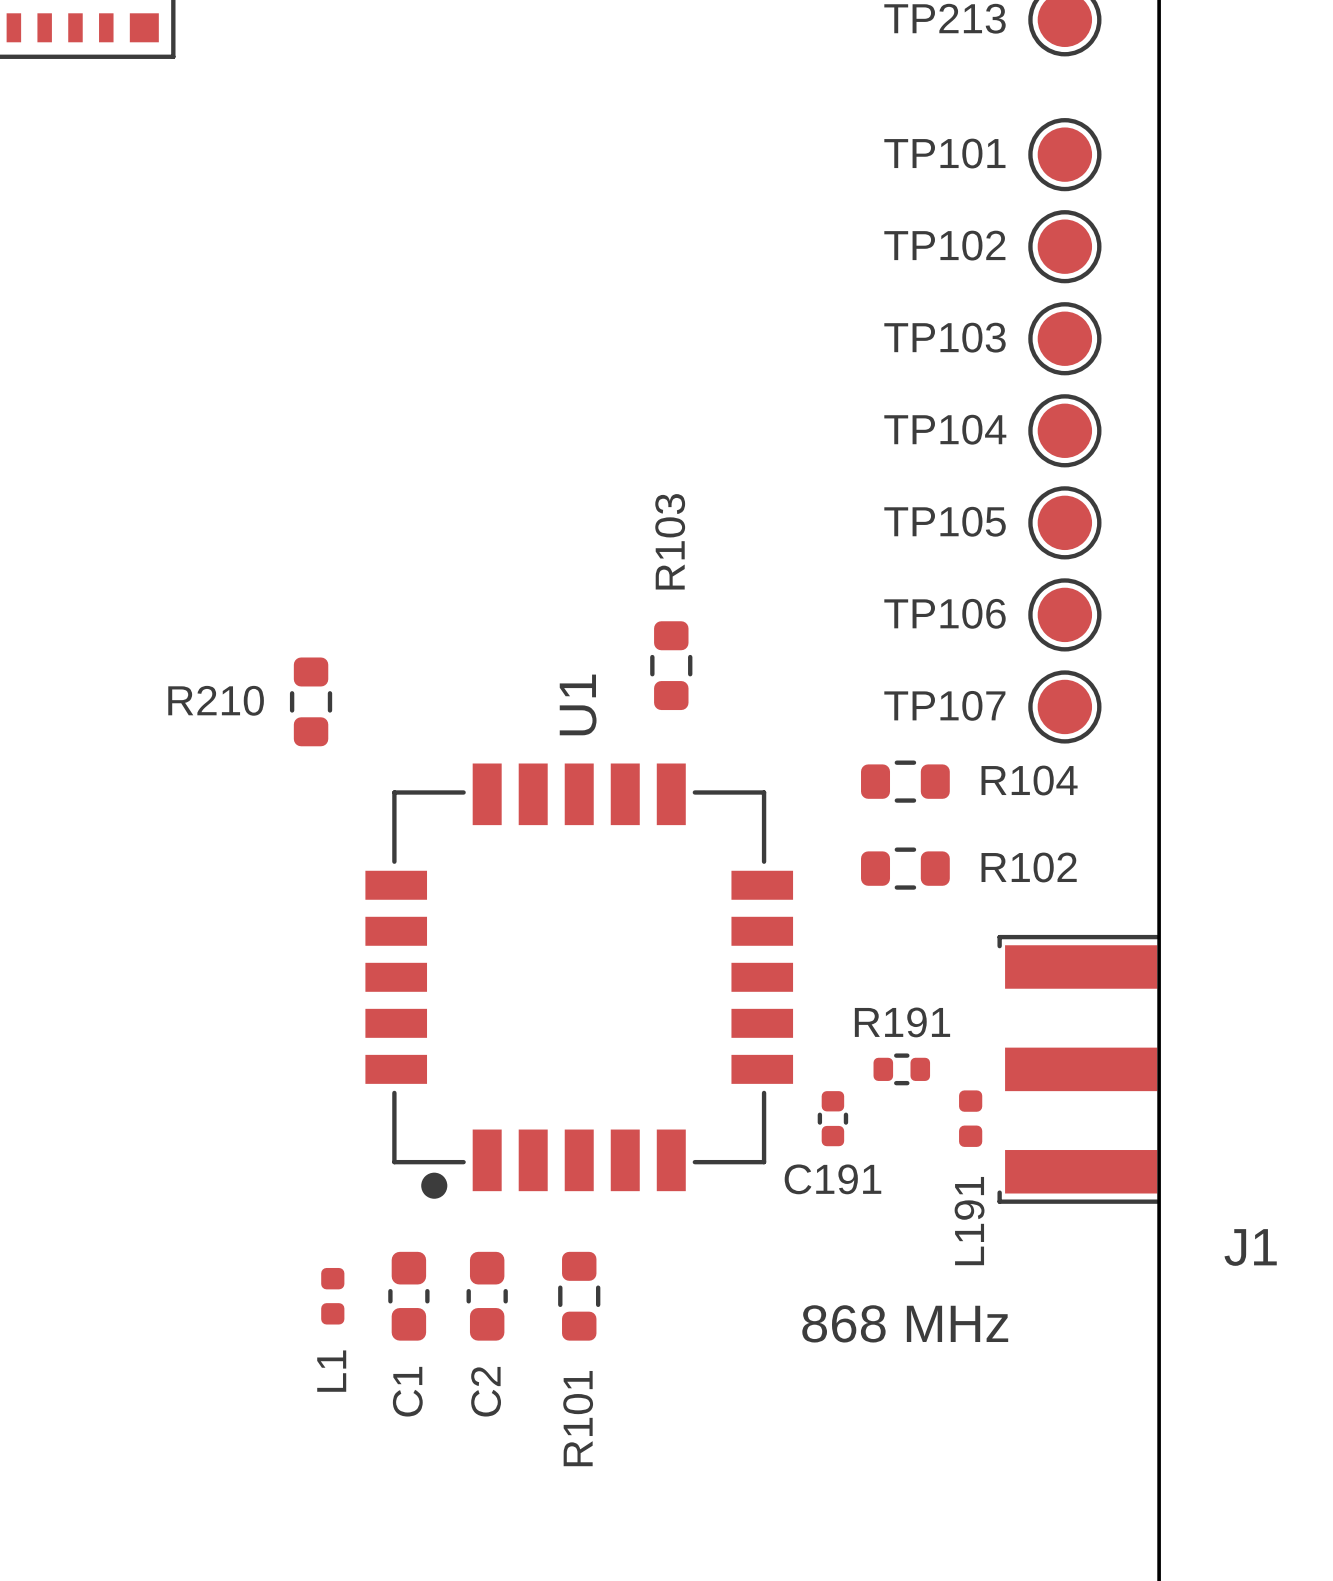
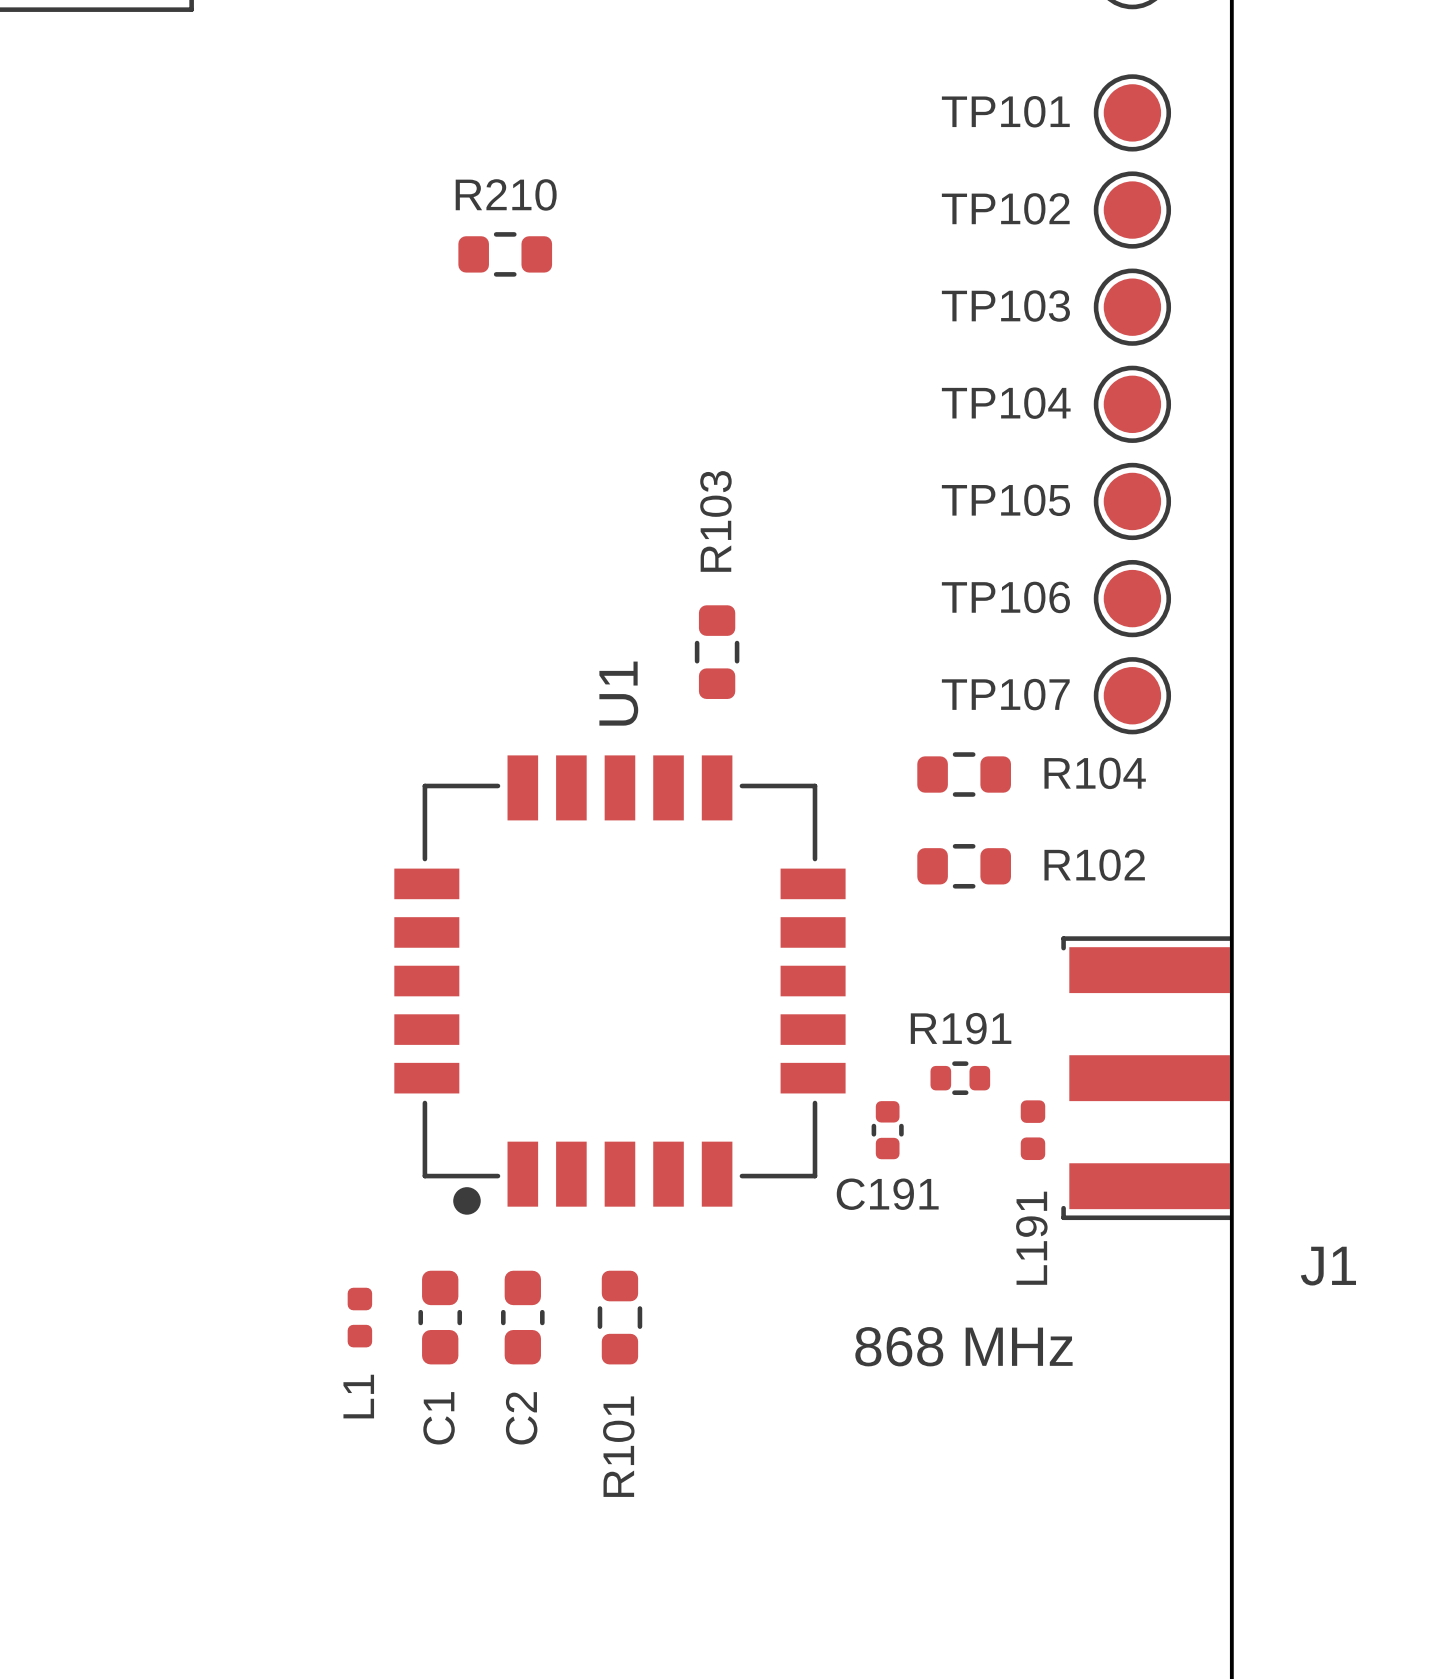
R210 rotation: 0° (311, 701) -> 90° clockwise (505, 254)
R210 position: (311, 701) -> (505, 254)

